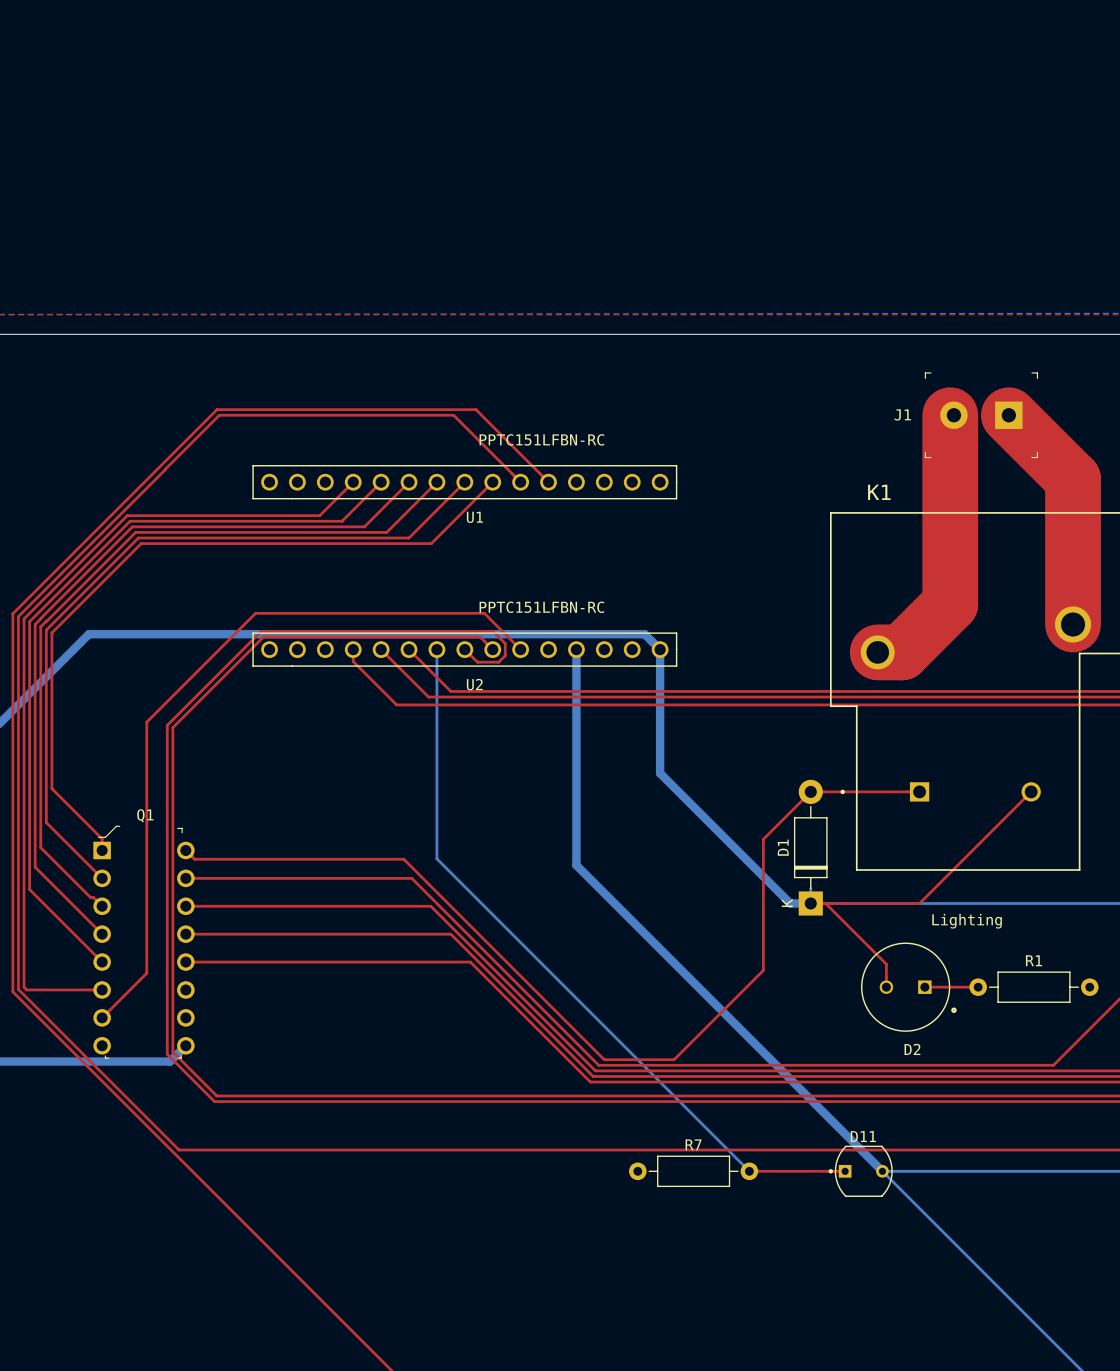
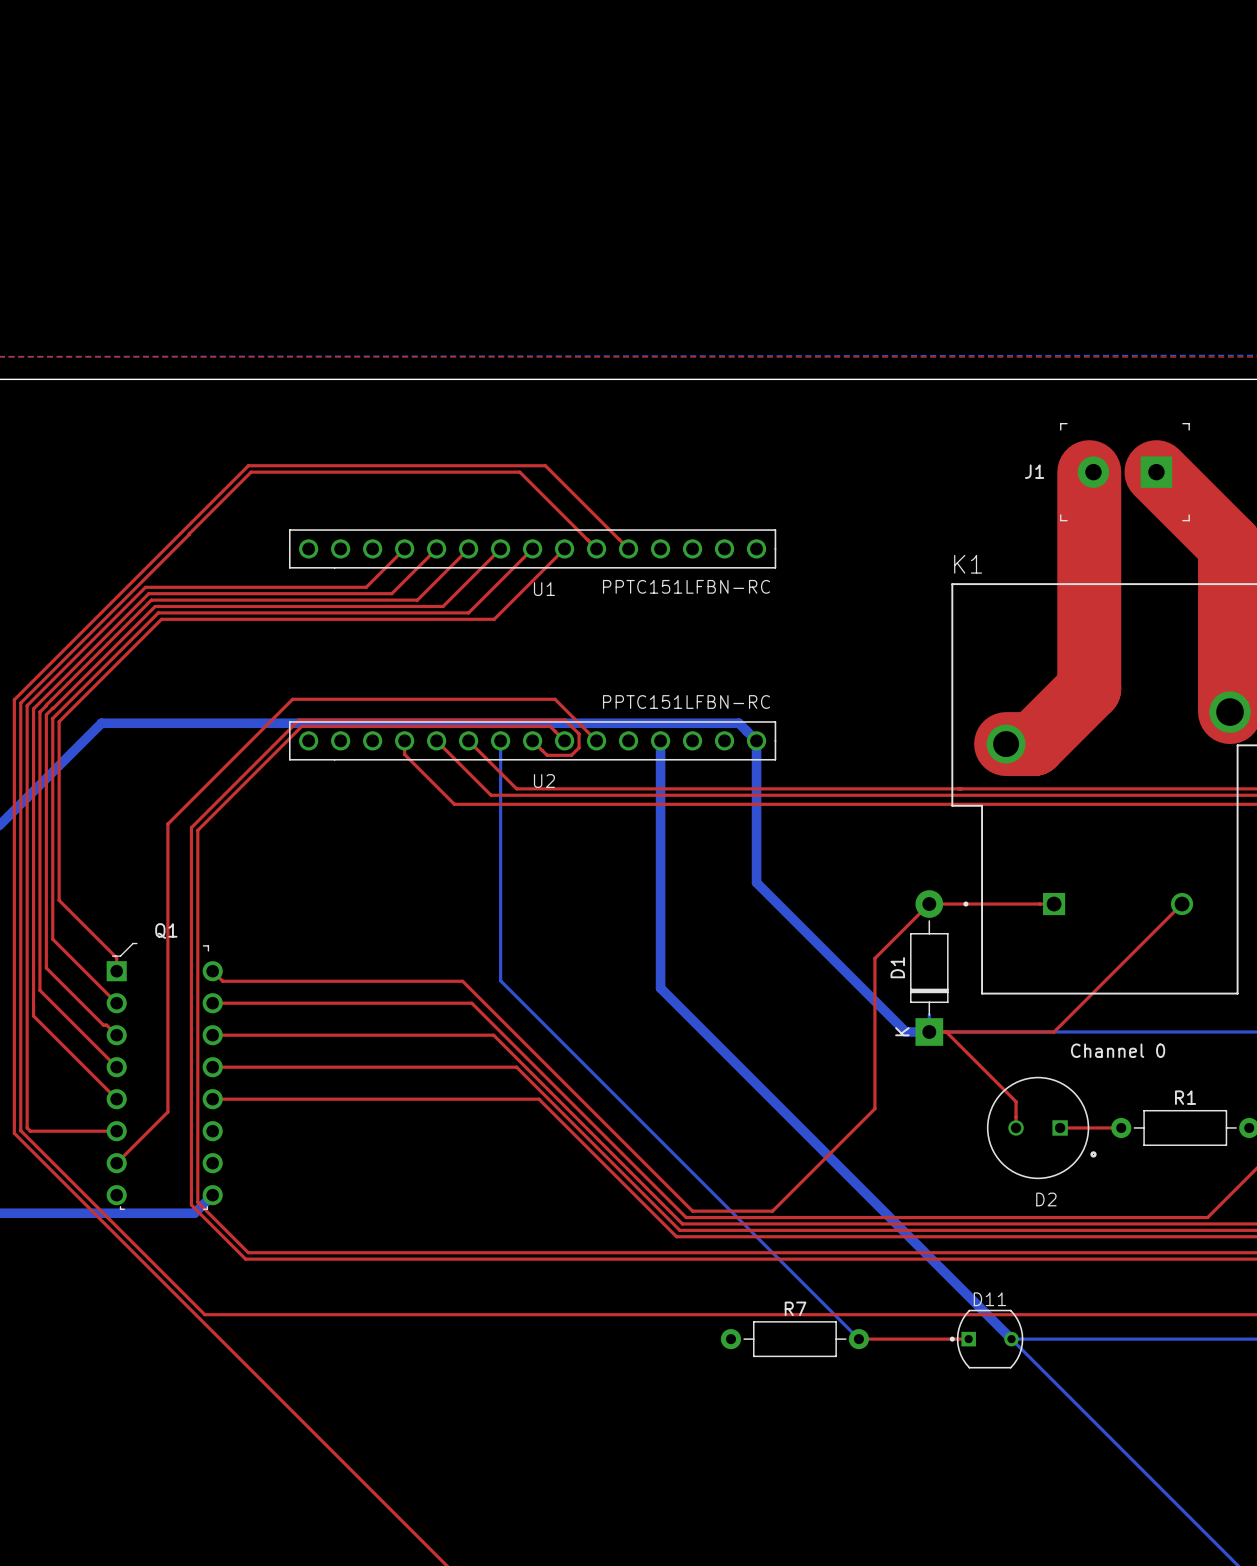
U1 text position: PPTC151LFBN-RC (541, 439) -> PPTC151LFBN-RC (686, 586)
K1 name position: K1 (879, 492) -> K1 (968, 564)
U2 text position: PPTC151LFBN-RC (541, 607) -> PPTC151LFBN-RC (686, 702)
text: Lighting (967, 921) -> Channel 0 (1118, 1050)

